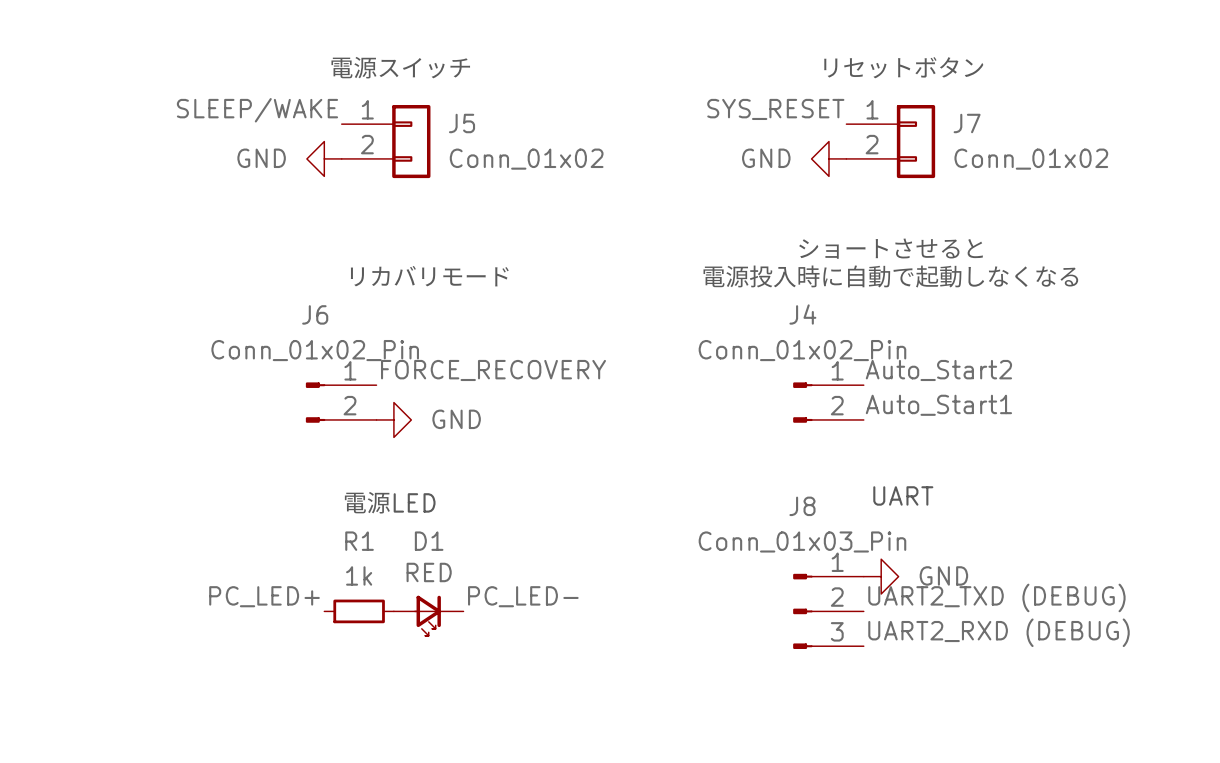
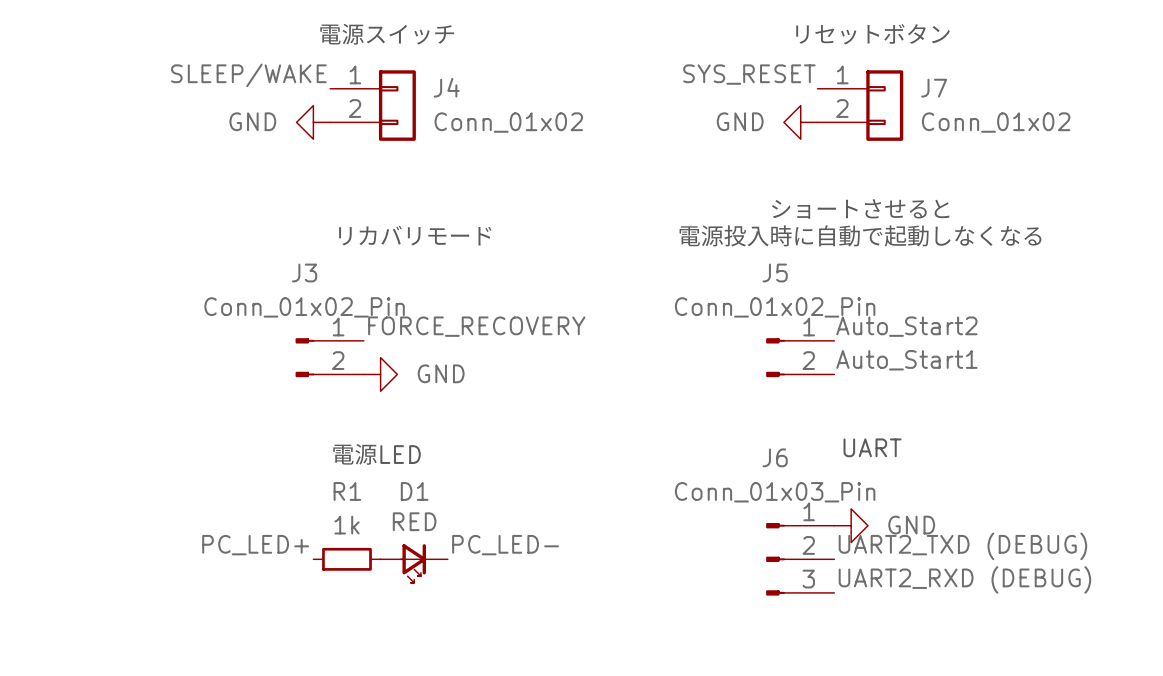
J5 name: J5 (462, 123) -> J4 (446, 87)
J6 name: J6 (315, 314) -> J3 (304, 273)
J4 name: J4 (802, 314) -> J5 (775, 273)
J8 name: J8 (802, 506) -> J6 (775, 457)

